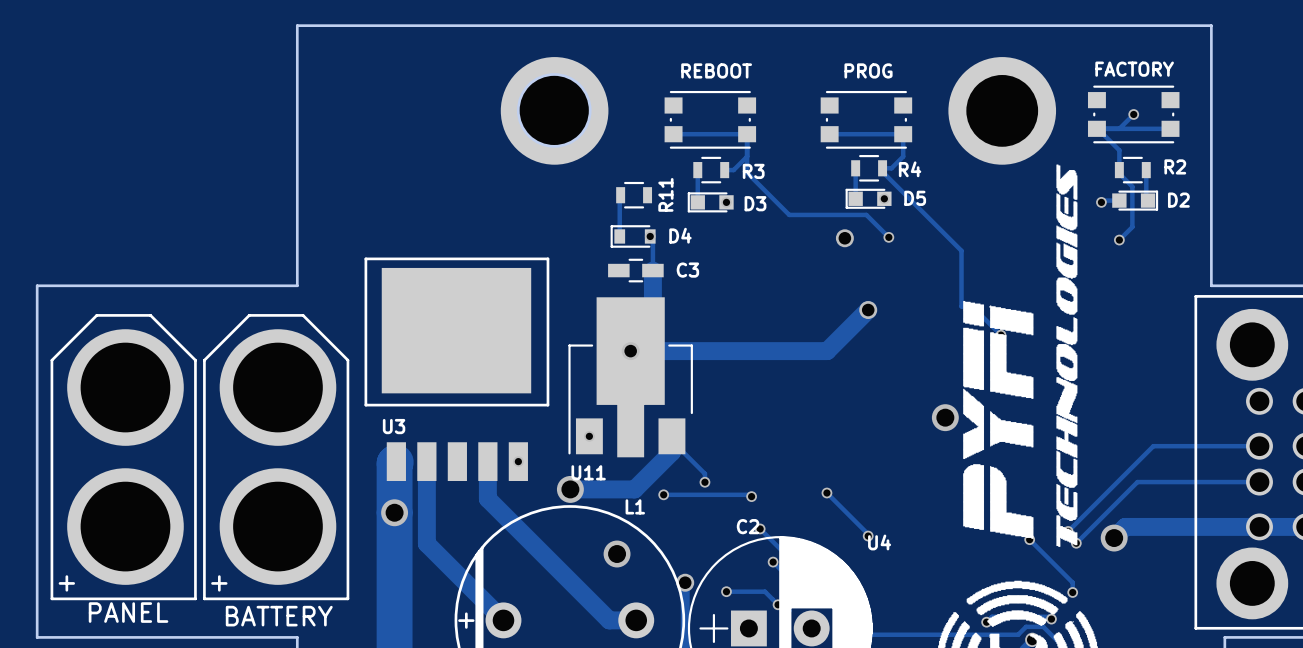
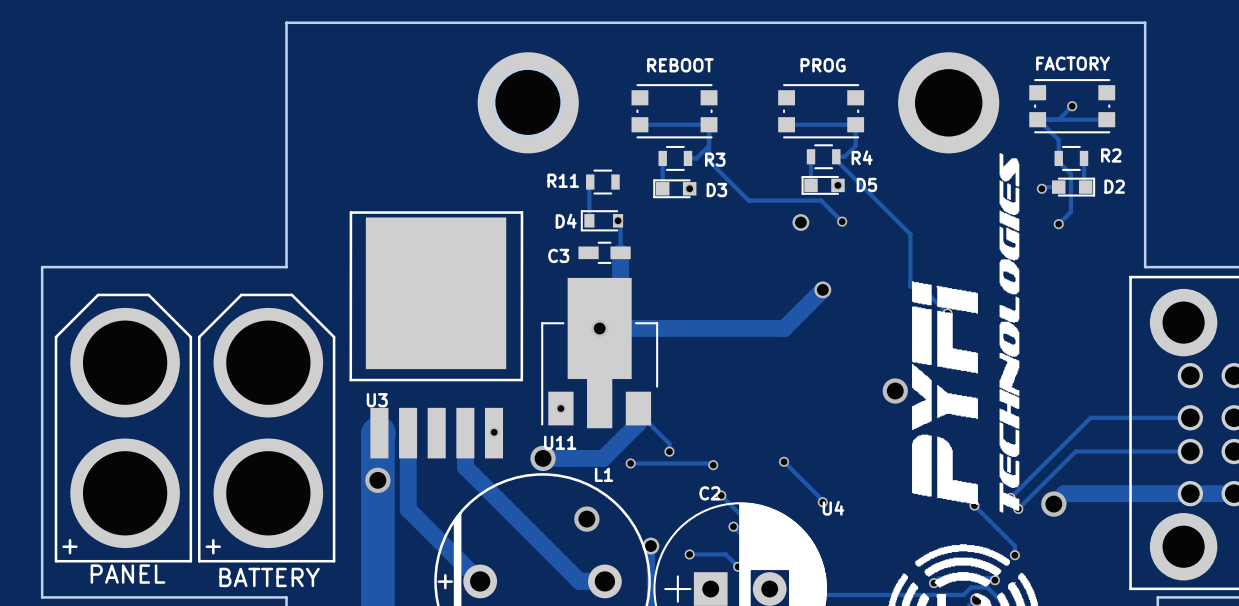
R11 name rotation: 0° (665, 194) -> 90° clockwise (563, 180)
R11 name position: R11 (665, 194) -> R11 (563, 180)
D4 name position: D4 (680, 235) -> D4 (566, 221)
U3 footprint: [364, 257, 550, 481] -> [349, 211, 524, 459]
C3 name position: C3 (687, 270) -> C3 (558, 255)

